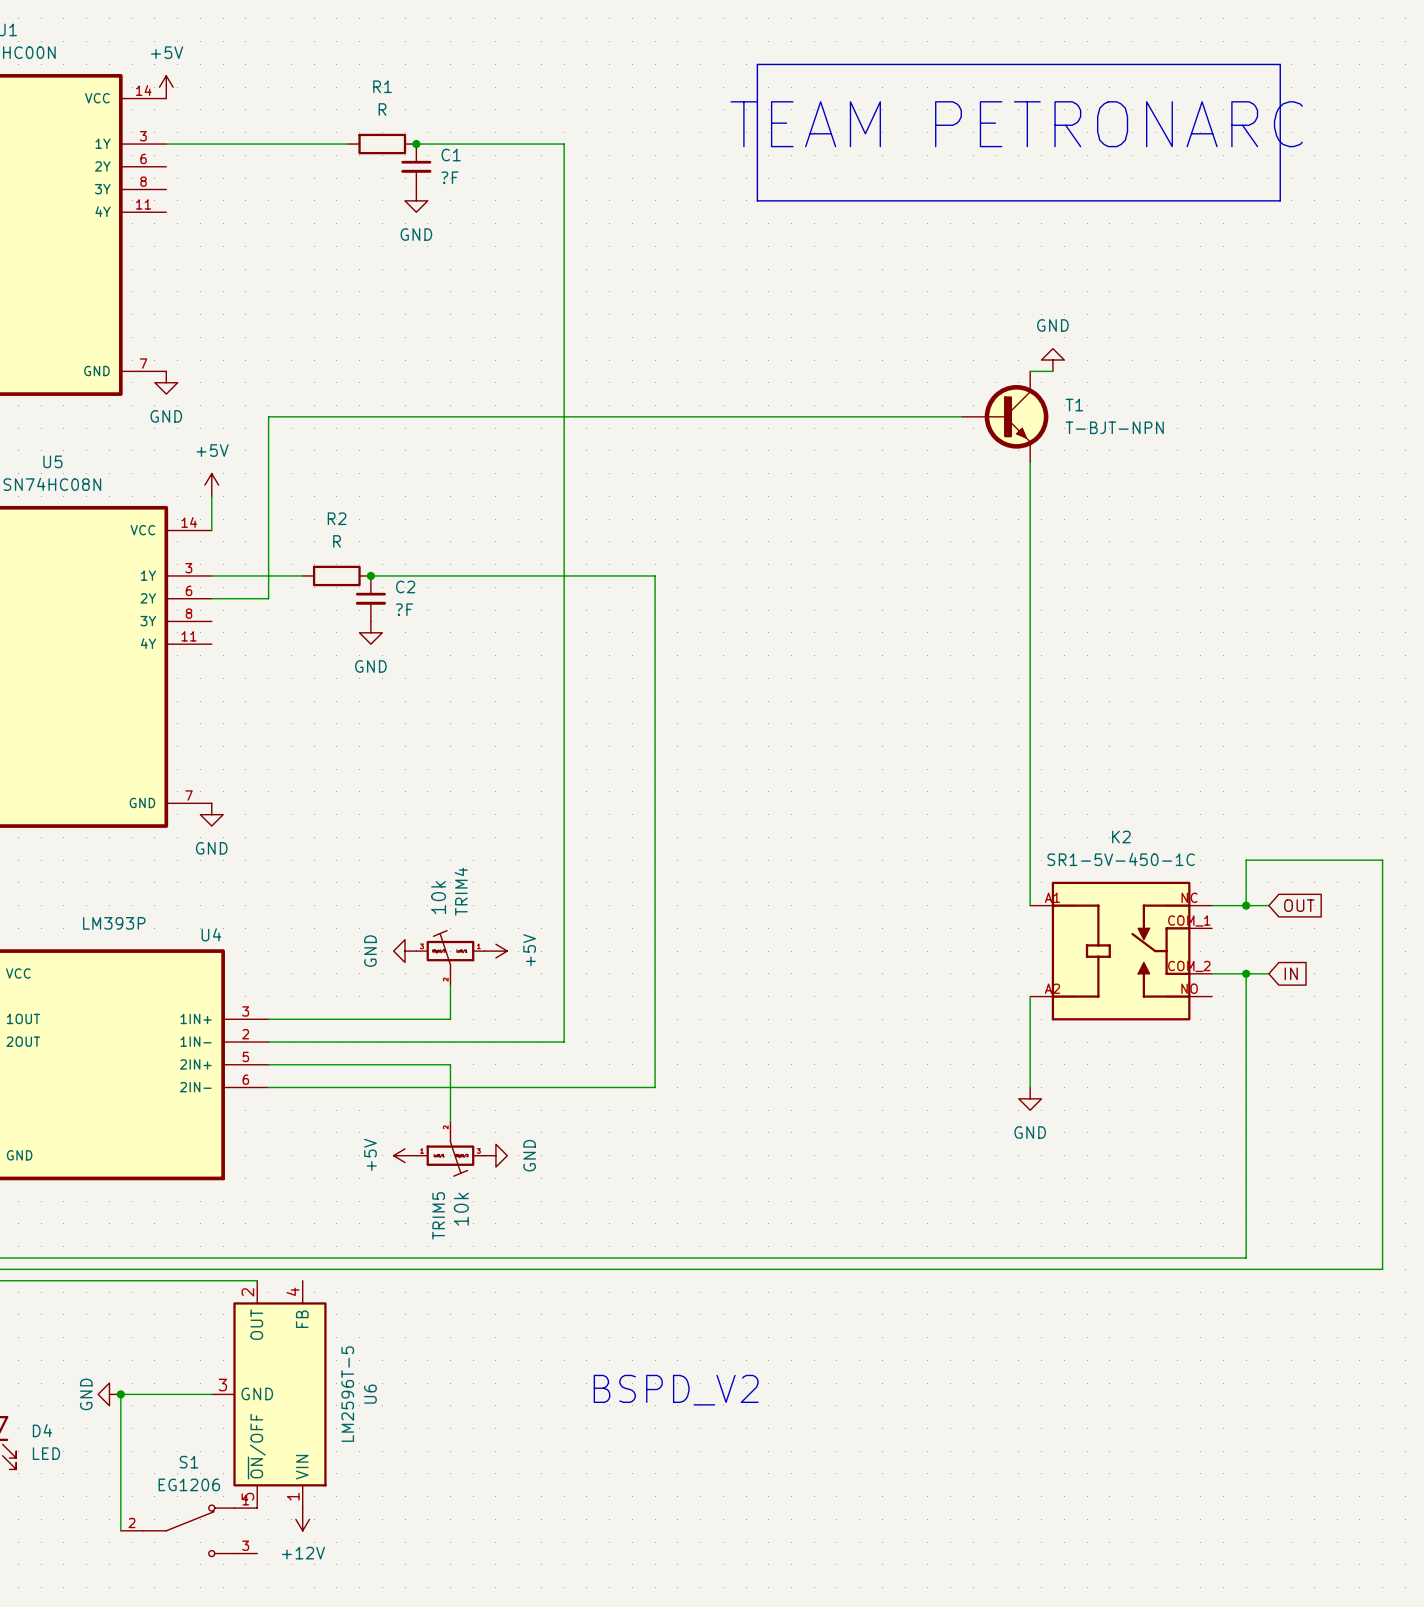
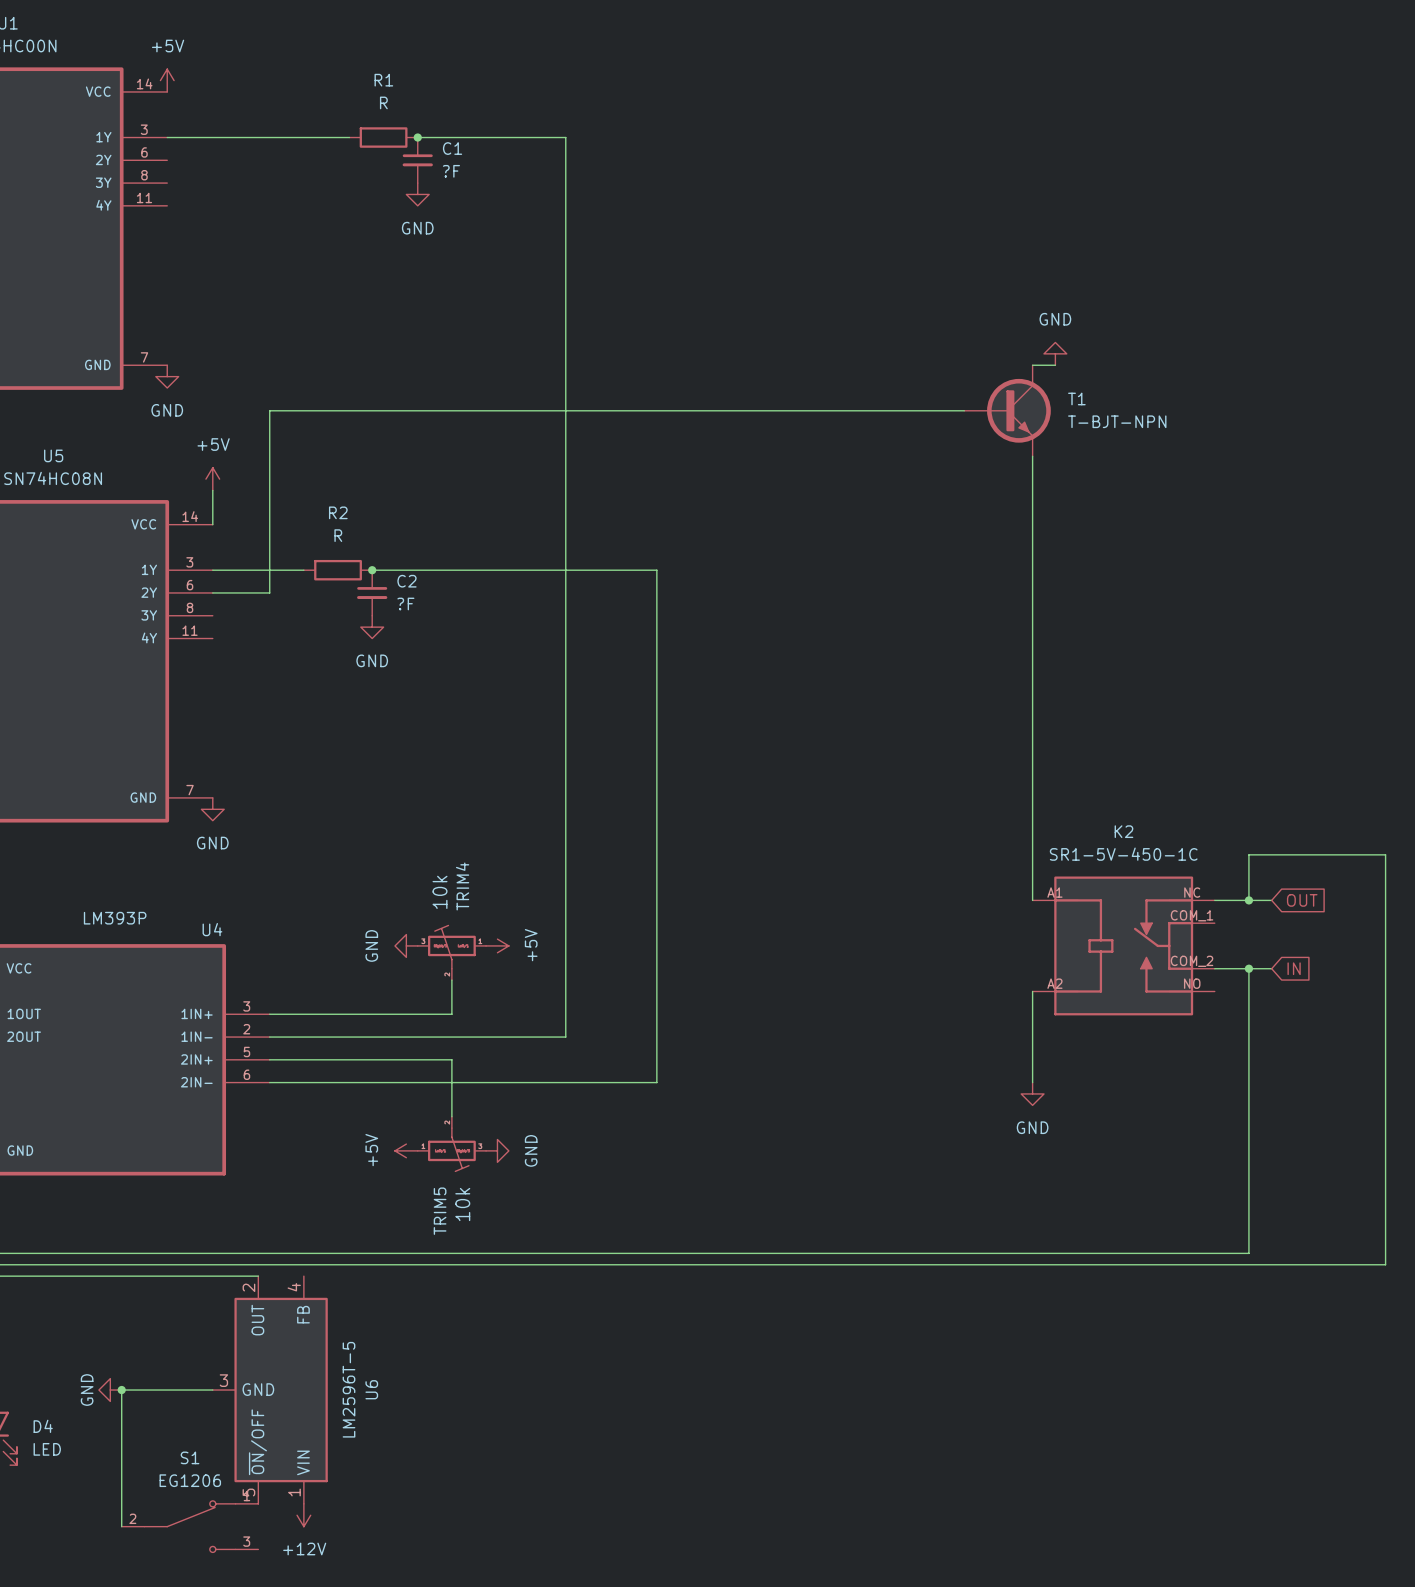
line: (757, 64) (1280, 64) (1280, 200) (757, 200) (757, 64) -> none
text: TEAM PETRONARC (1016, 124) -> none
text: BSPD_V2 (676, 1390) -> none

